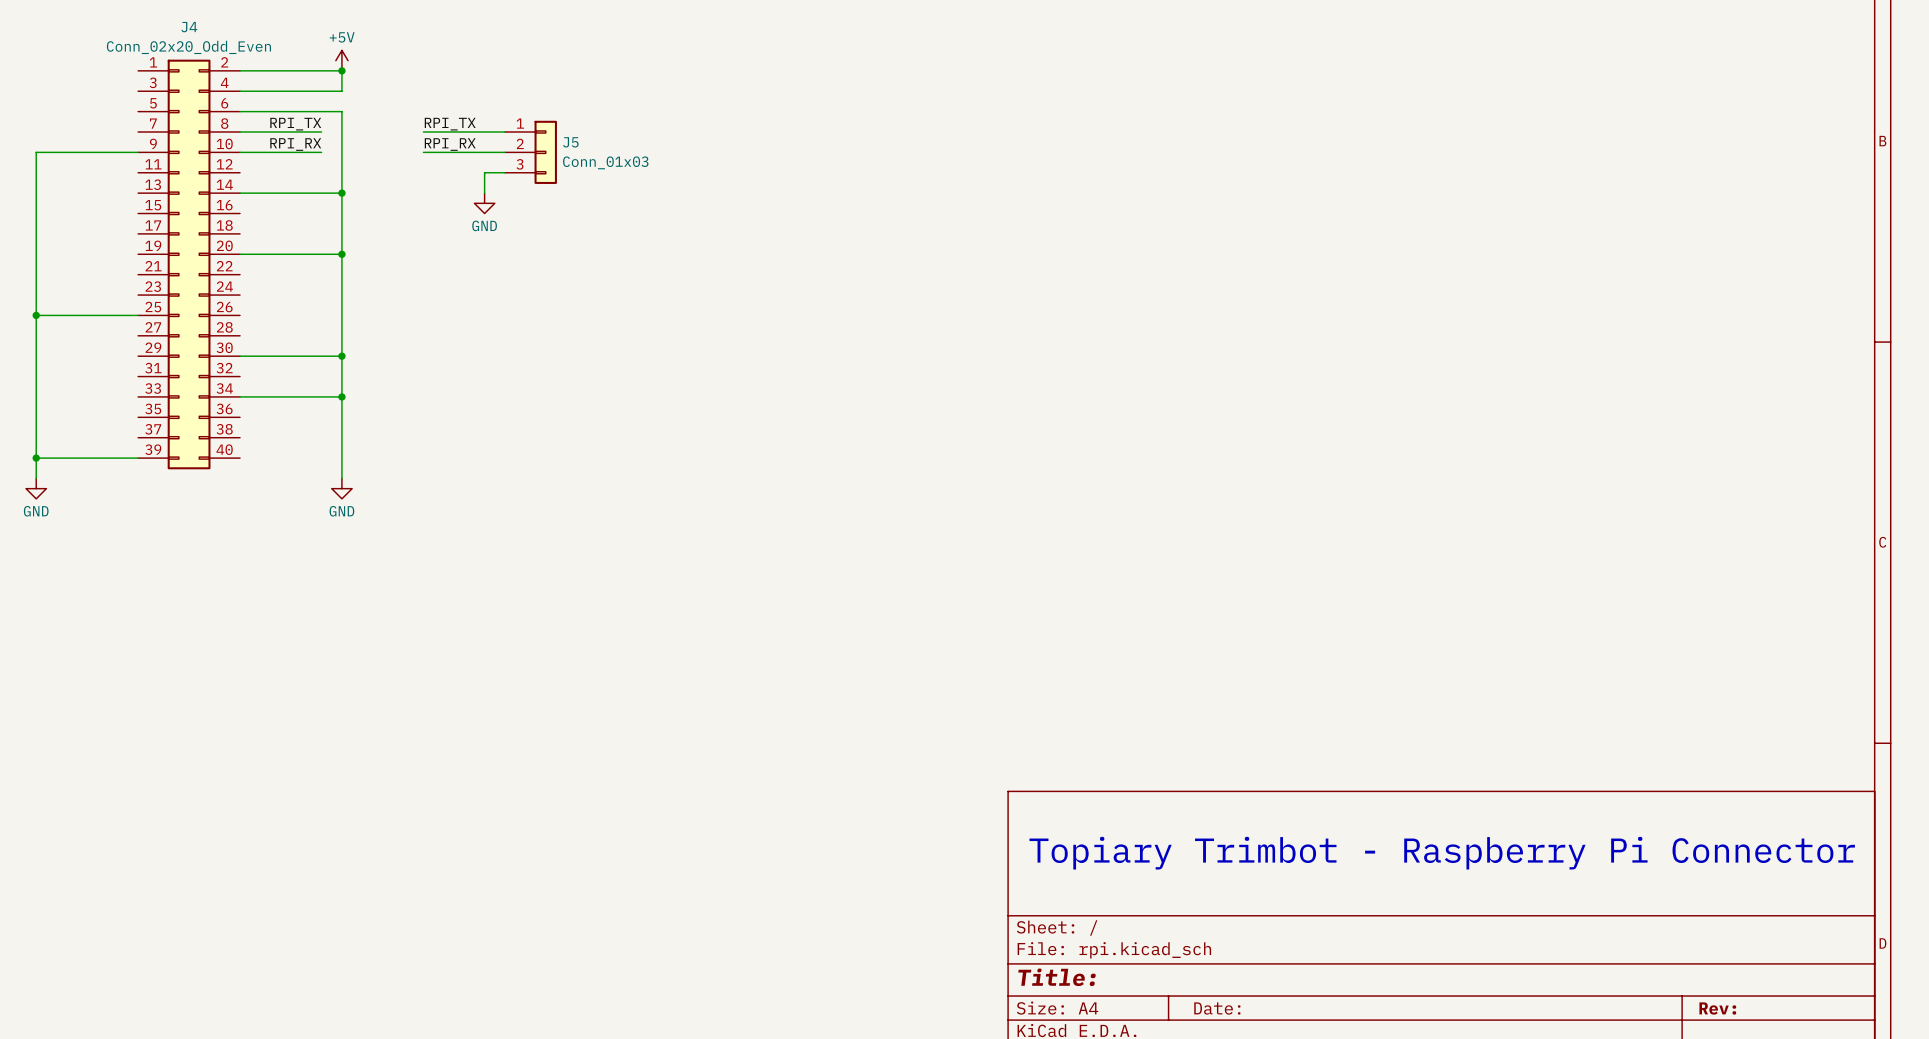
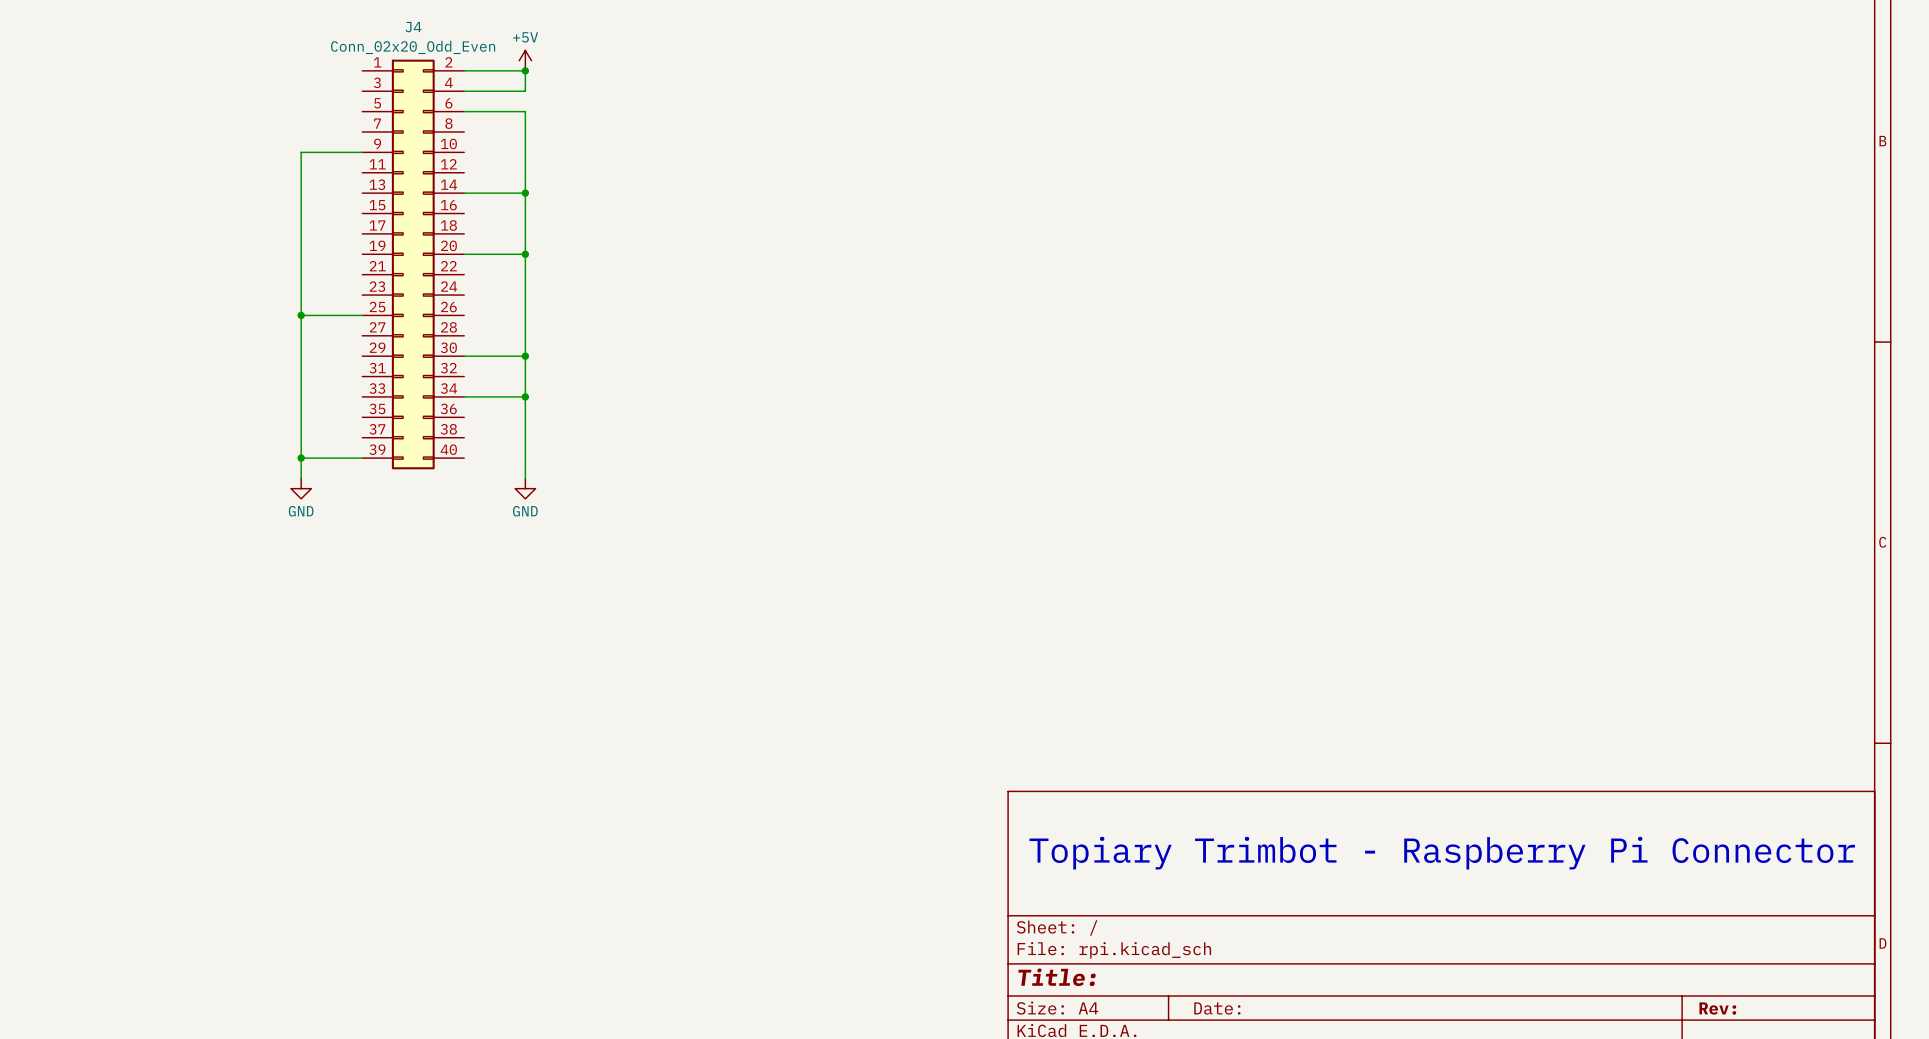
power symbol position: +5V (341, 60) -> +5V (525, 60)
wire: (240, 70) (341, 70) (341, 91) (240, 91) -> none
junction: (341, 70) -> none
wire: none -> (464, 70) (525, 70) (525, 91) (464, 91)
junction: none -> (525, 70)
wire: (240, 111) (341, 111) (341, 478) -> none
wire: none -> (464, 111) (525, 111) (525, 478)
label: RPI_TX (295, 124) -> none
label: RPI_TX (450, 124) -> none
wire: (240, 131) (321, 131) -> none
wire: (423, 131) (504, 131) -> none
label: RPI_RX (295, 144) -> none
label: RPI_RX (450, 144) -> none
wire: (138, 152) (36, 152) (36, 478) -> none
wire: (240, 152) (301, 152) -> (301, 478) (301, 152)
wire: none -> (321, 152) (362, 152)
wire: (423, 152) (504, 152) -> none
J5: Conn_01x03 (530, 152) -> none
wire: (504, 172) (484, 172) (484, 193) -> none
wire: (240, 193) (341, 193) -> none
junction: (341, 193) -> none
wire: none -> (464, 193) (525, 193)
junction: none -> (525, 193)
power symbol: GND (484, 203) -> none
wire: (240, 254) (341, 254) -> none
junction: (341, 254) -> none
wire: none -> (464, 254) (525, 254)
junction: none -> (525, 254)
J4 position: (189, 264) -> (413, 264)
wire: (36, 315) (138, 315) -> none
junction: (36, 315) -> none
wire: none -> (301, 315) (362, 315)
junction: none -> (301, 315)
wire: (240, 356) (341, 356) -> none
junction: (341, 356) -> none
wire: none -> (464, 356) (525, 356)
junction: none -> (525, 356)
wire: (240, 396) (341, 396) -> none
junction: (341, 396) -> none
wire: none -> (464, 396) (525, 396)
junction: none -> (525, 396)
wire: (36, 458) (138, 458) -> none
junction: (36, 458) -> none
wire: none -> (301, 458) (362, 458)
junction: none -> (301, 458)
power symbol: GND (36, 488) -> none
power symbol position: GND (341, 488) -> GND (301, 488)
power symbol: none -> GND (525, 488)

